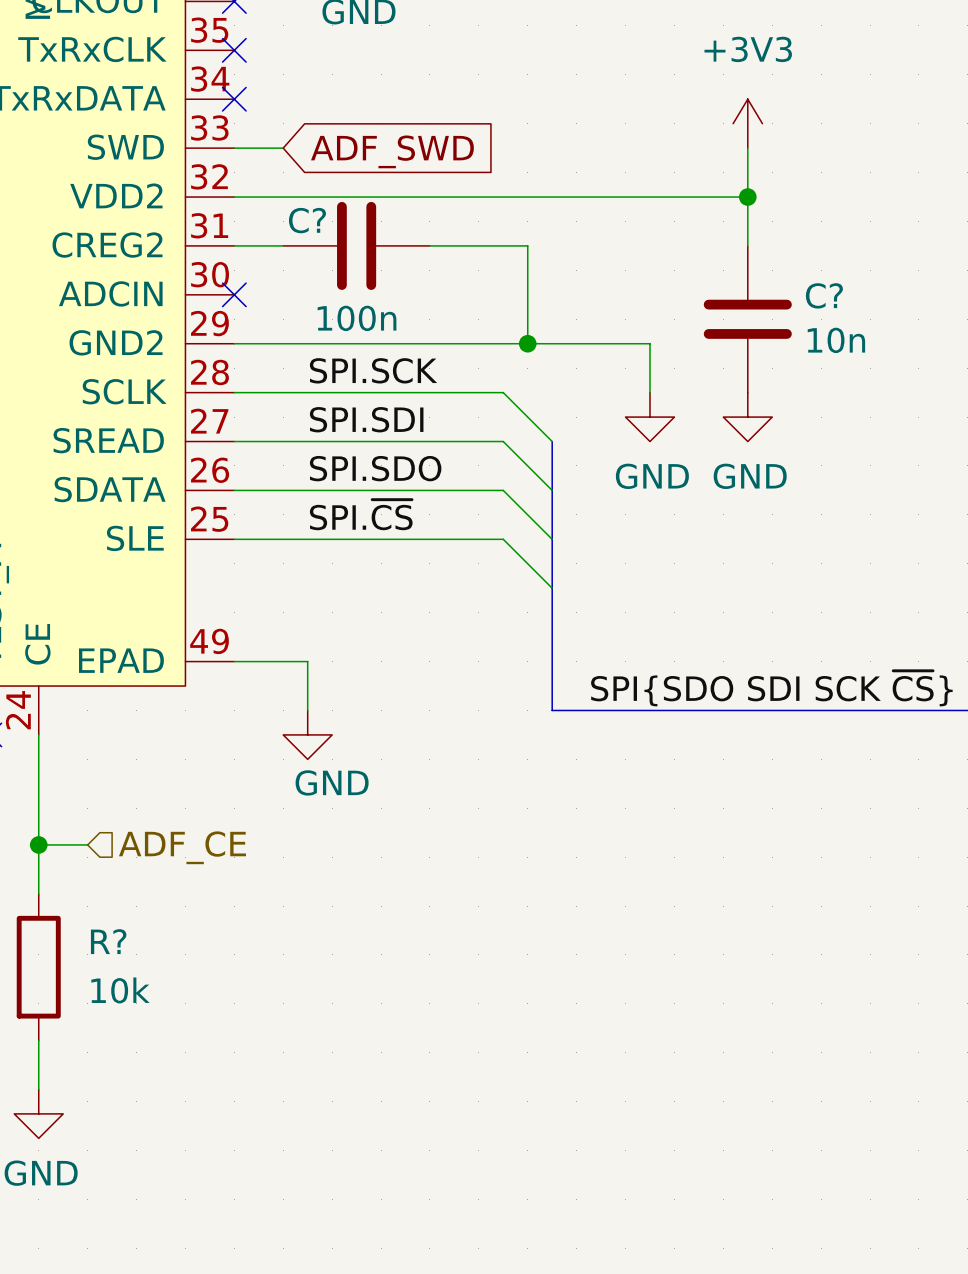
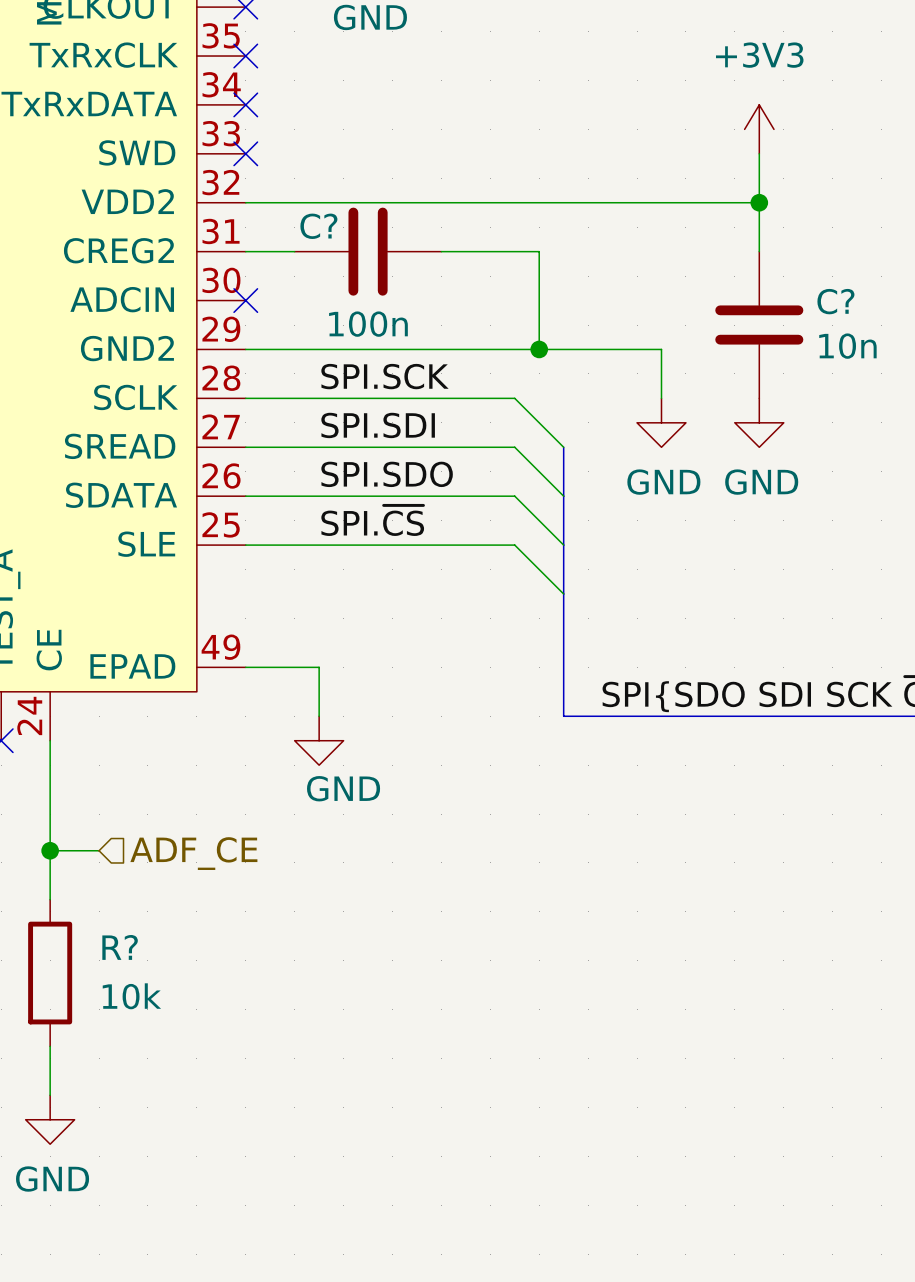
wire: (234, 148) (283, 148) -> none
no-connect mark: none -> (245, 153)
global label: ADF_SWD (392, 151) -> none

